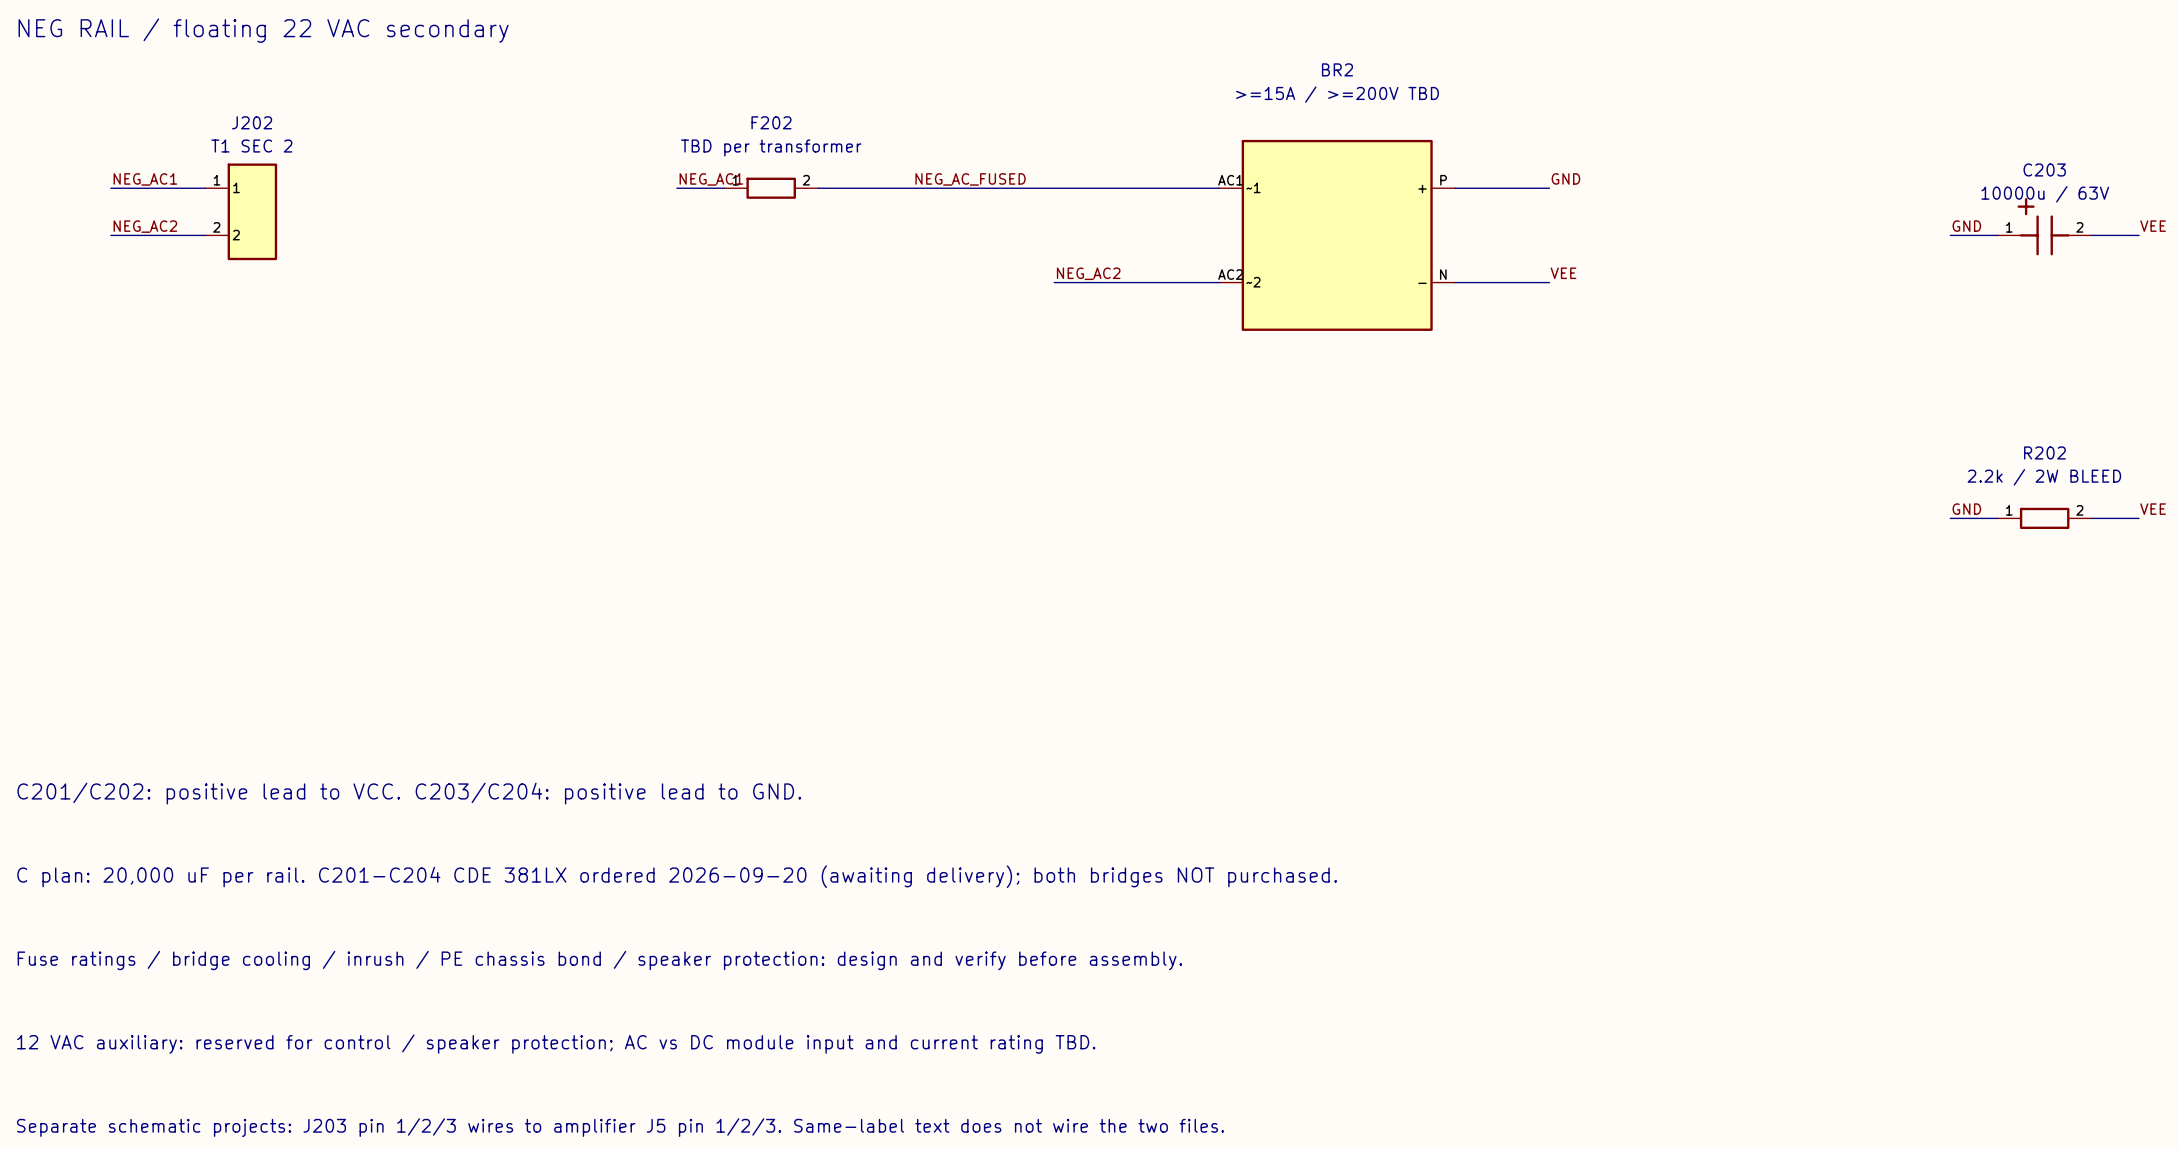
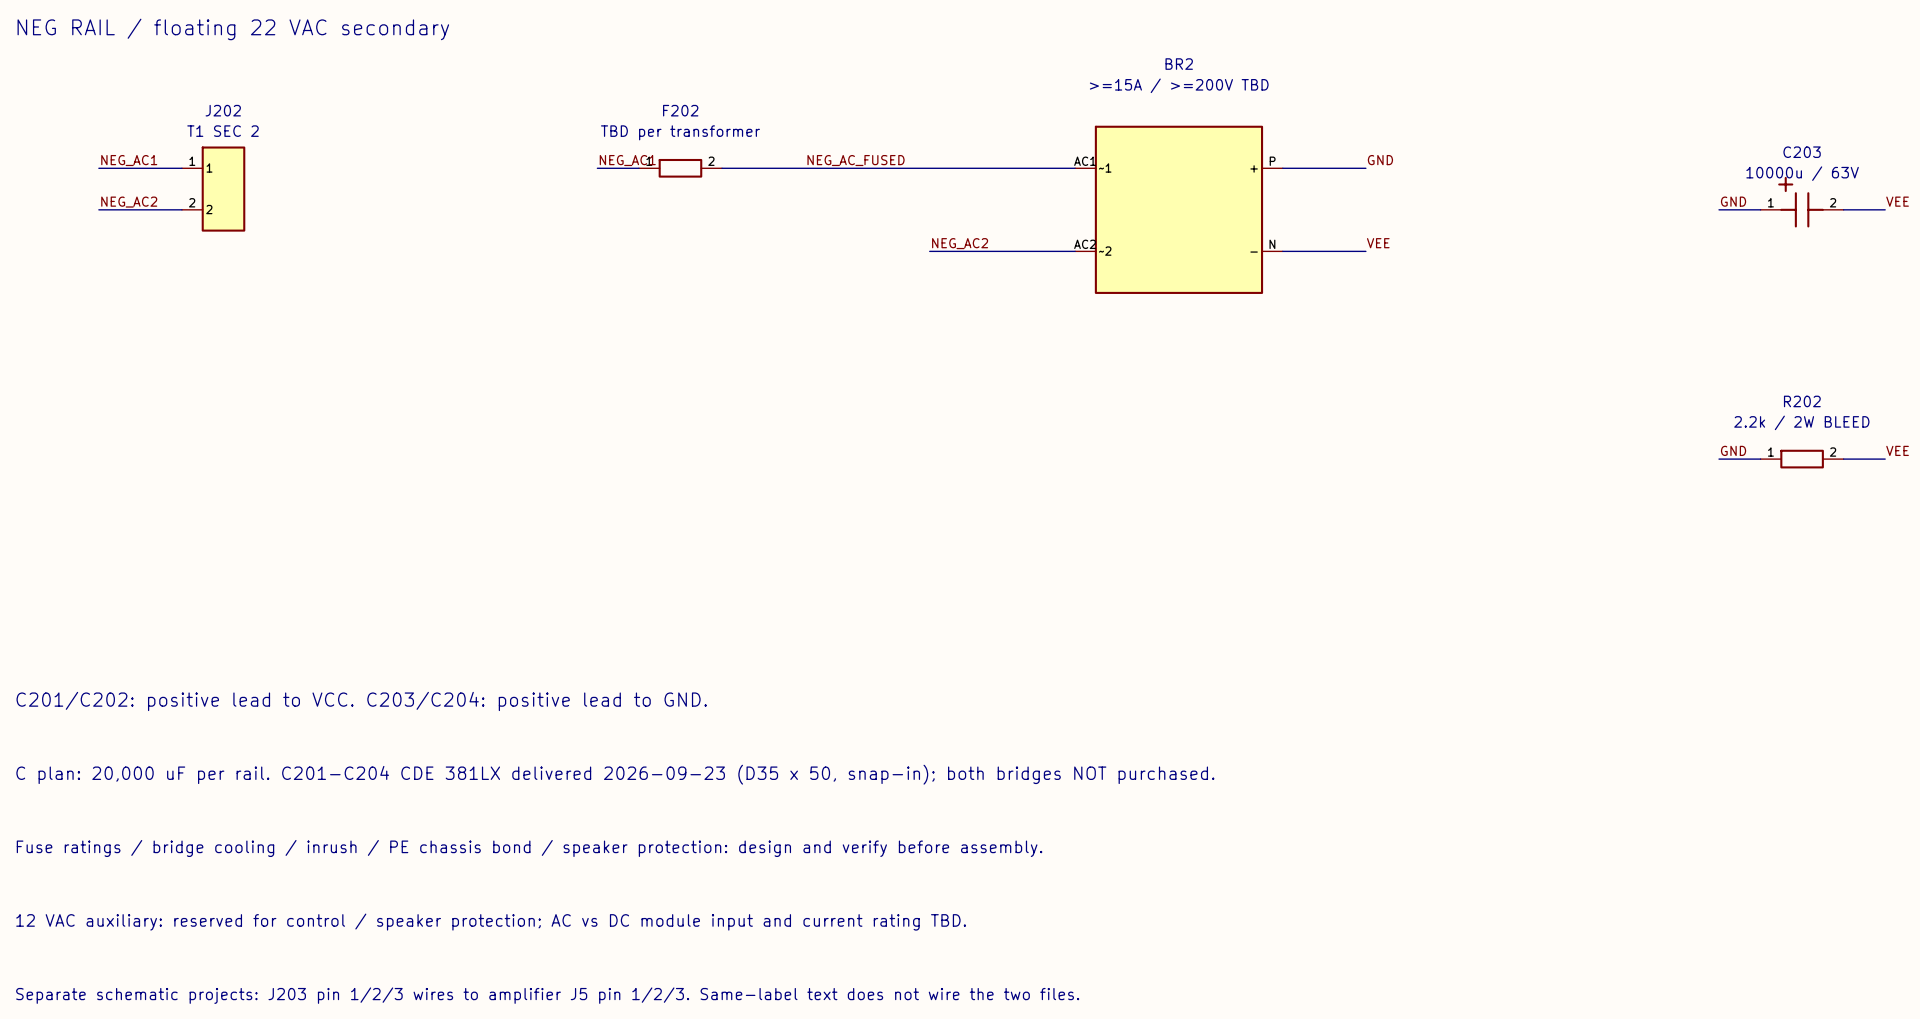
text: C plan: 20,000 uF per rail. C201-C204 CDE 381LX ordered 2026-09-20 (awaiting delivery); both bridges NOT purchased. (677, 876) -> C plan: 20,000 uF per rail. C201-C204 CDE 381LX delivered 2026-09-23 (D35 x 50, snap-in); both bridges NOT purchased. (615, 774)

